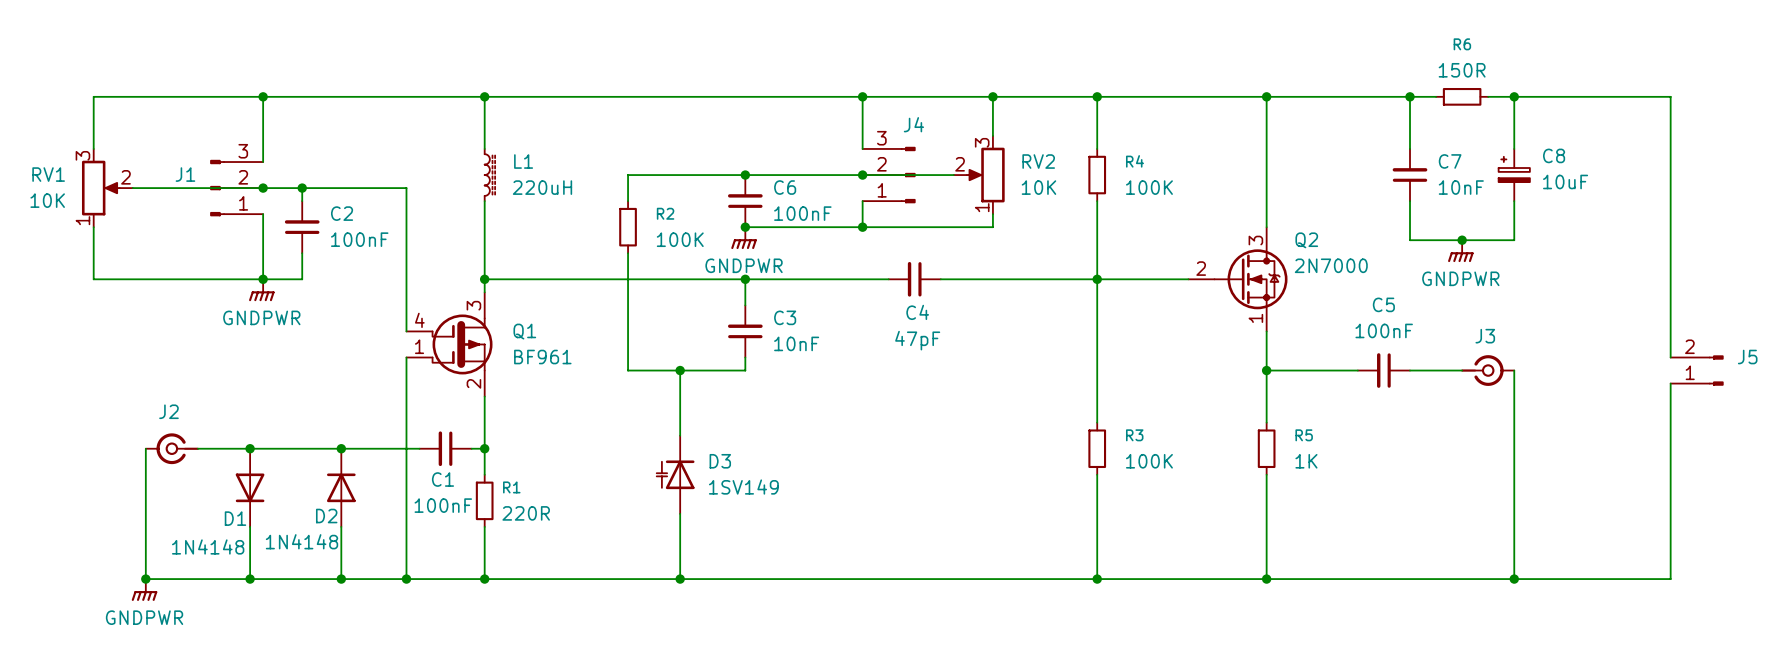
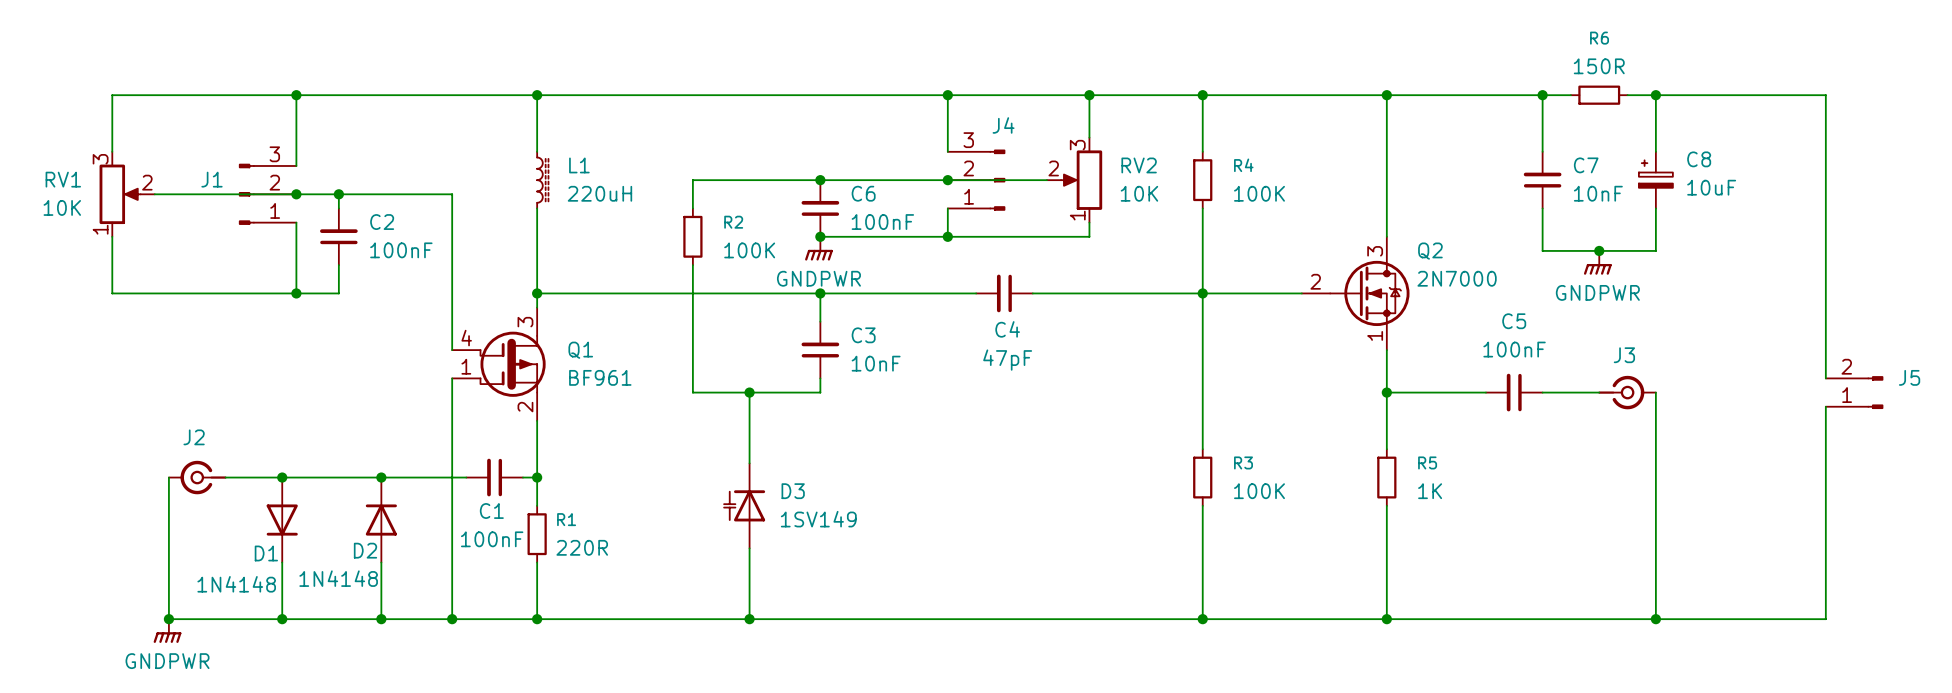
power symbol: GNDPWR (261, 290) -> none

